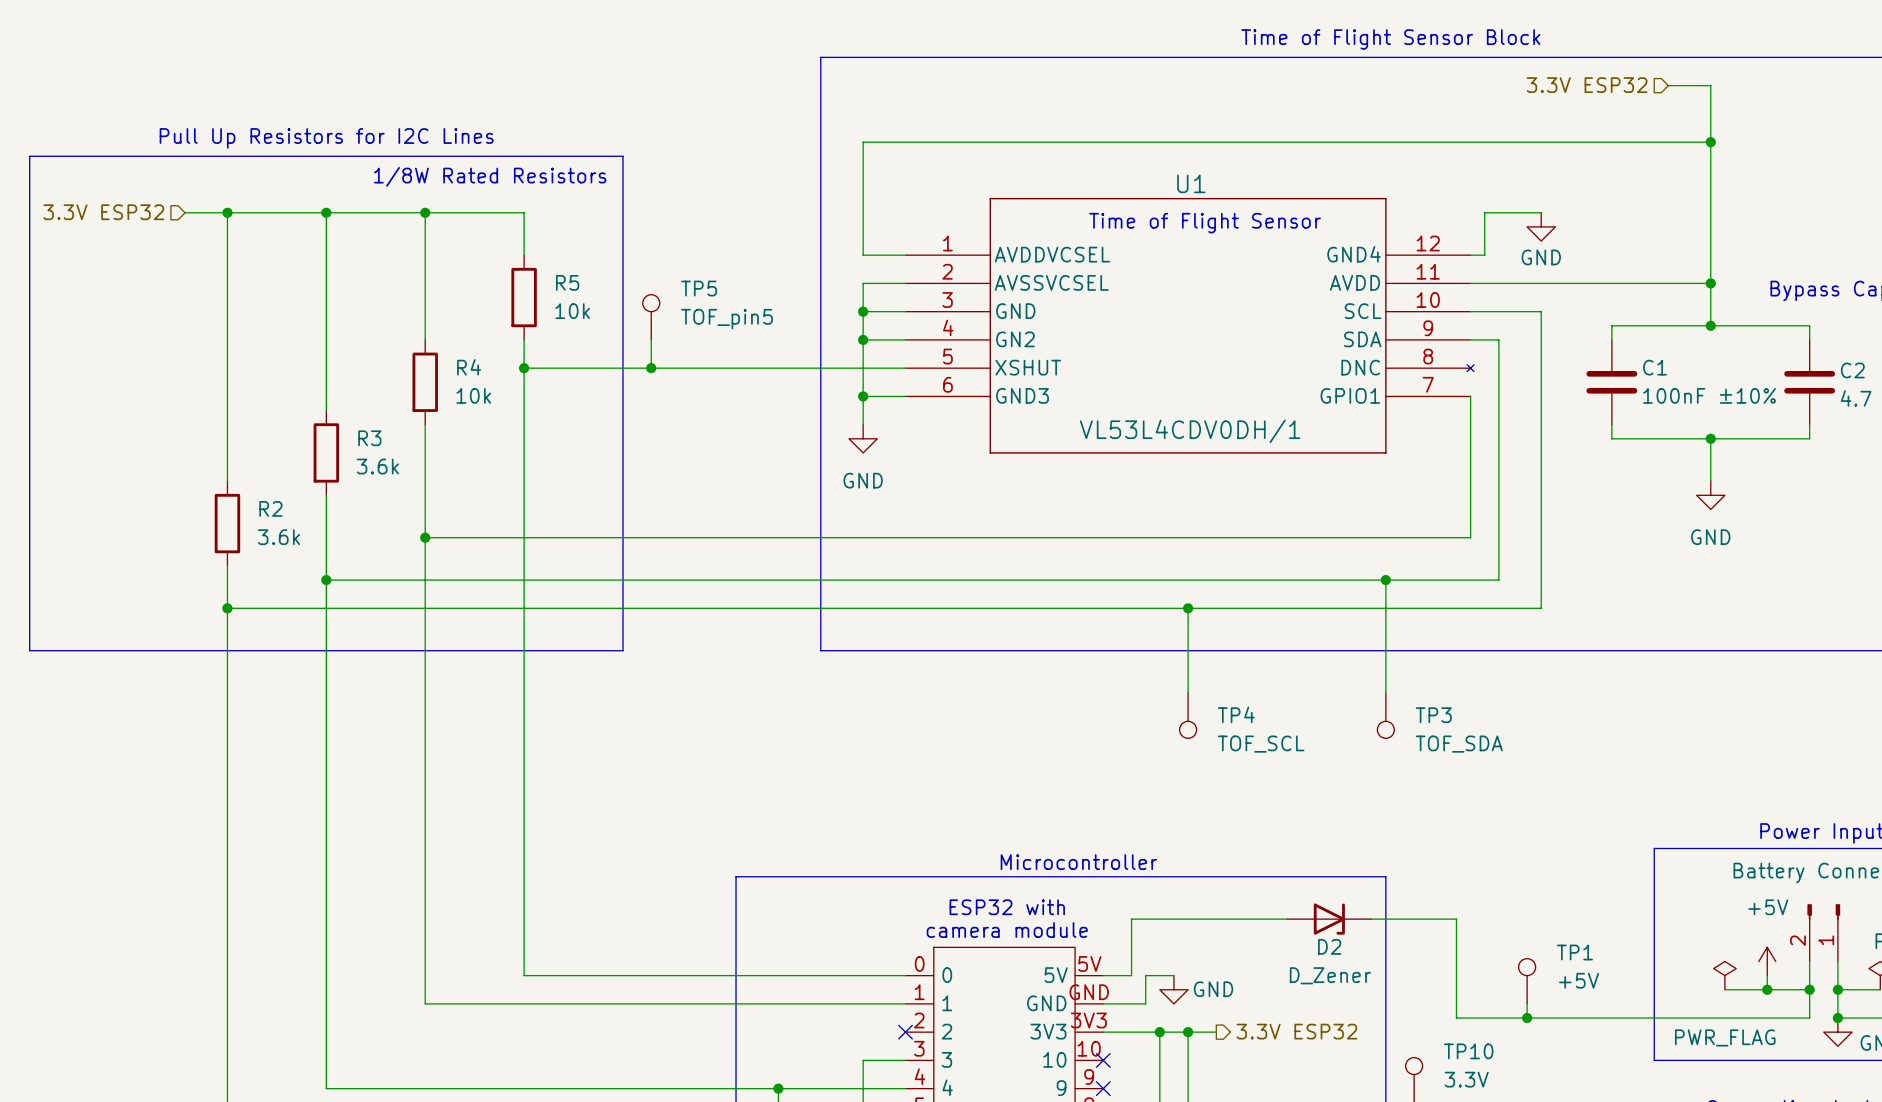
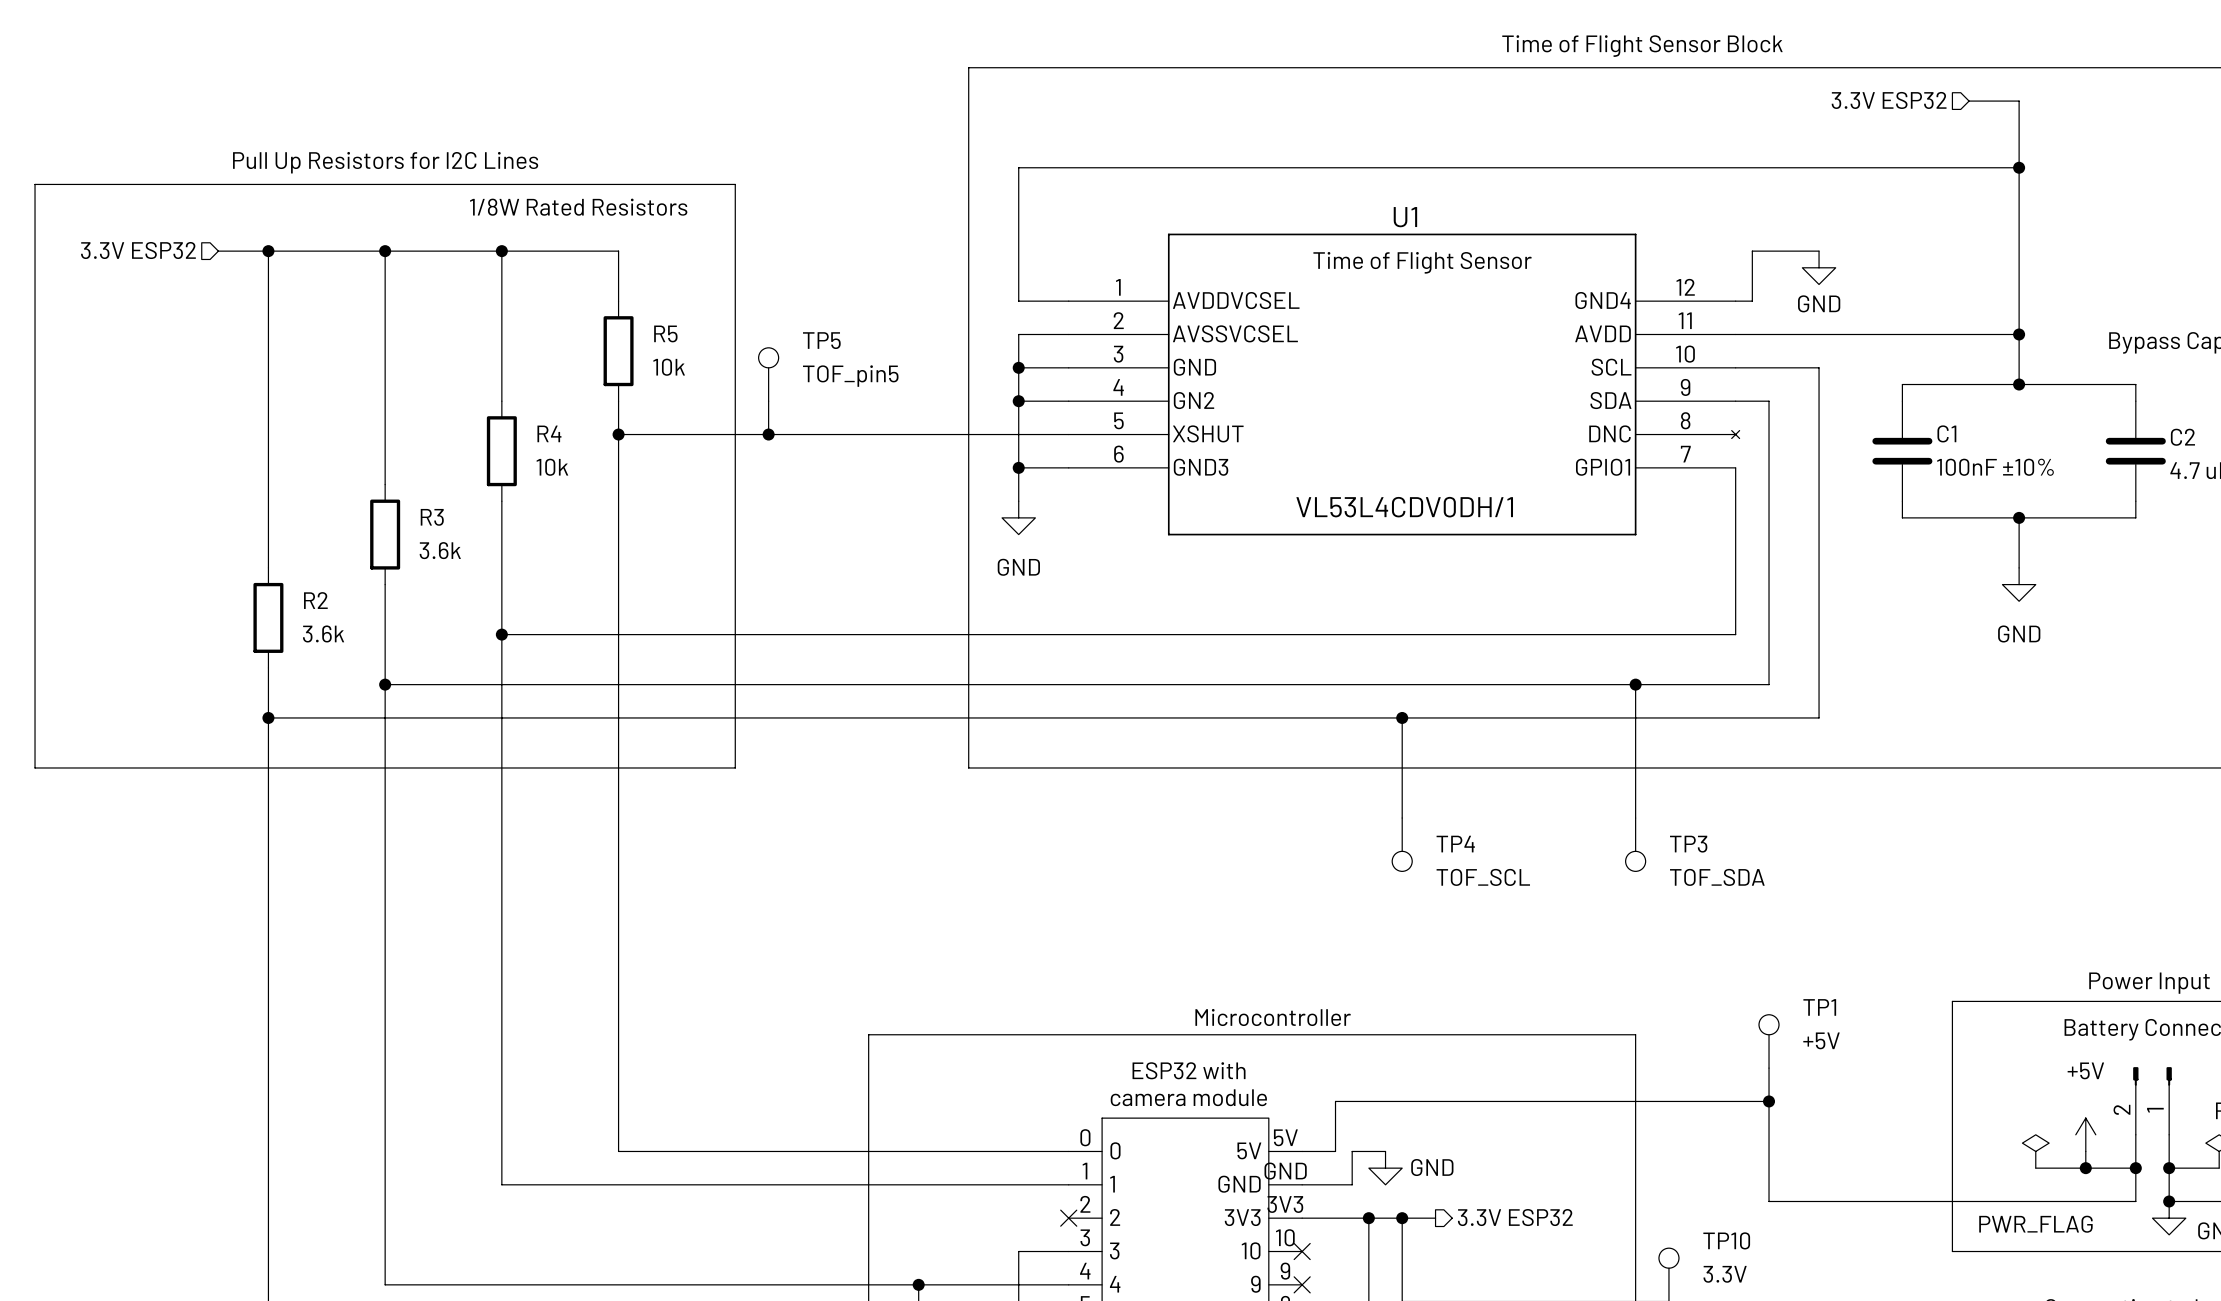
wire: (1286, 919) (1131, 919) (1131, 933) -> (1769, 1101) (1335, 1101)
D2: D_Zener (1329, 919) -> none
wire: (1371, 919) (1456, 919) (1456, 1018) (1498, 1018) -> (1769, 1068) (1769, 1201)
junction: none -> (1769, 1101)
TP1 position: (1527, 981) -> (1769, 1041)
wire: (1527, 1003) (1527, 1018) -> none
junction: (1527, 1018) -> none

